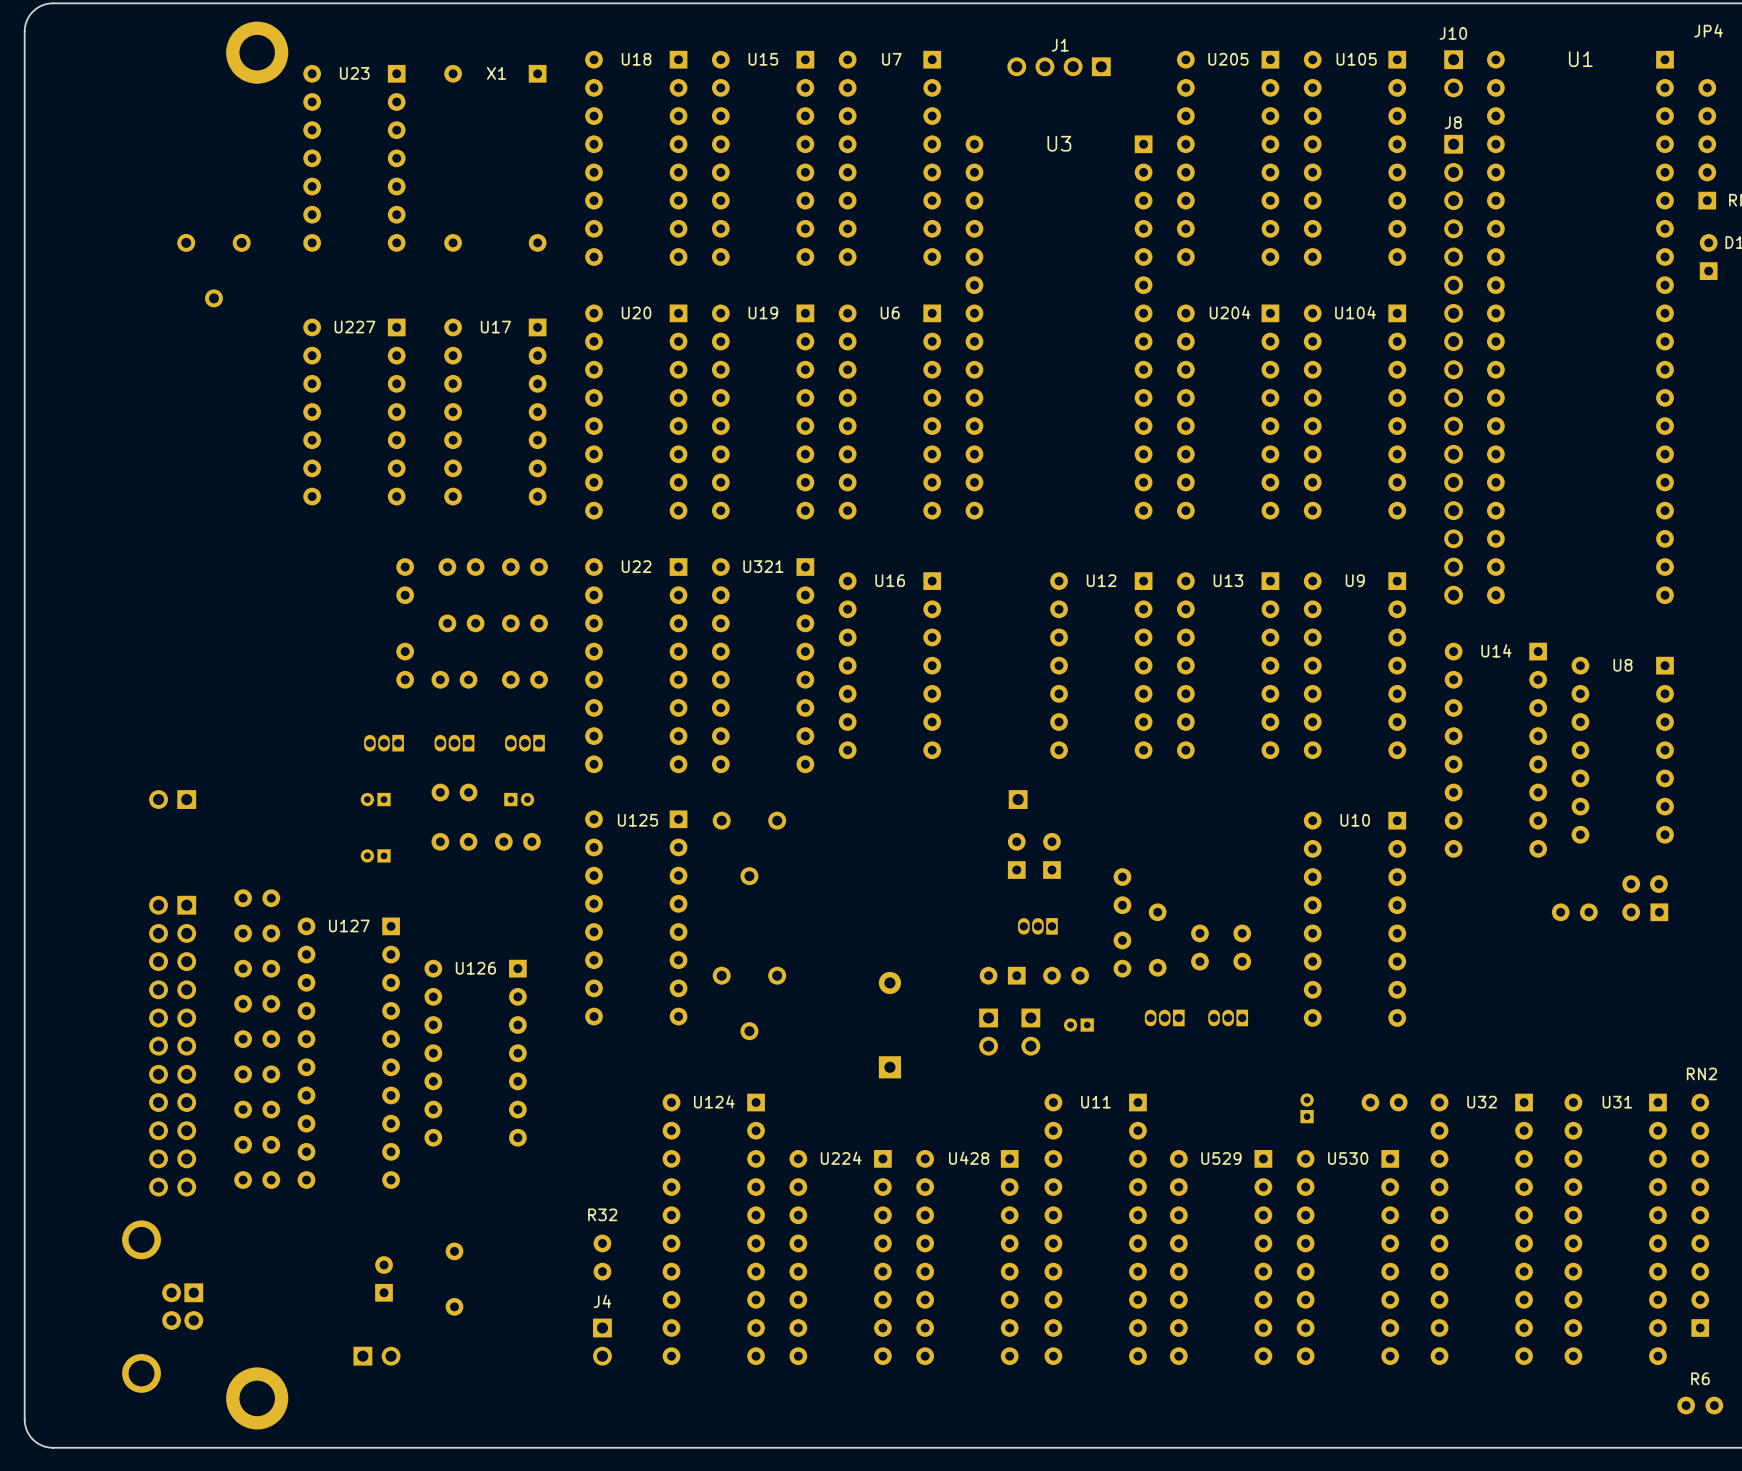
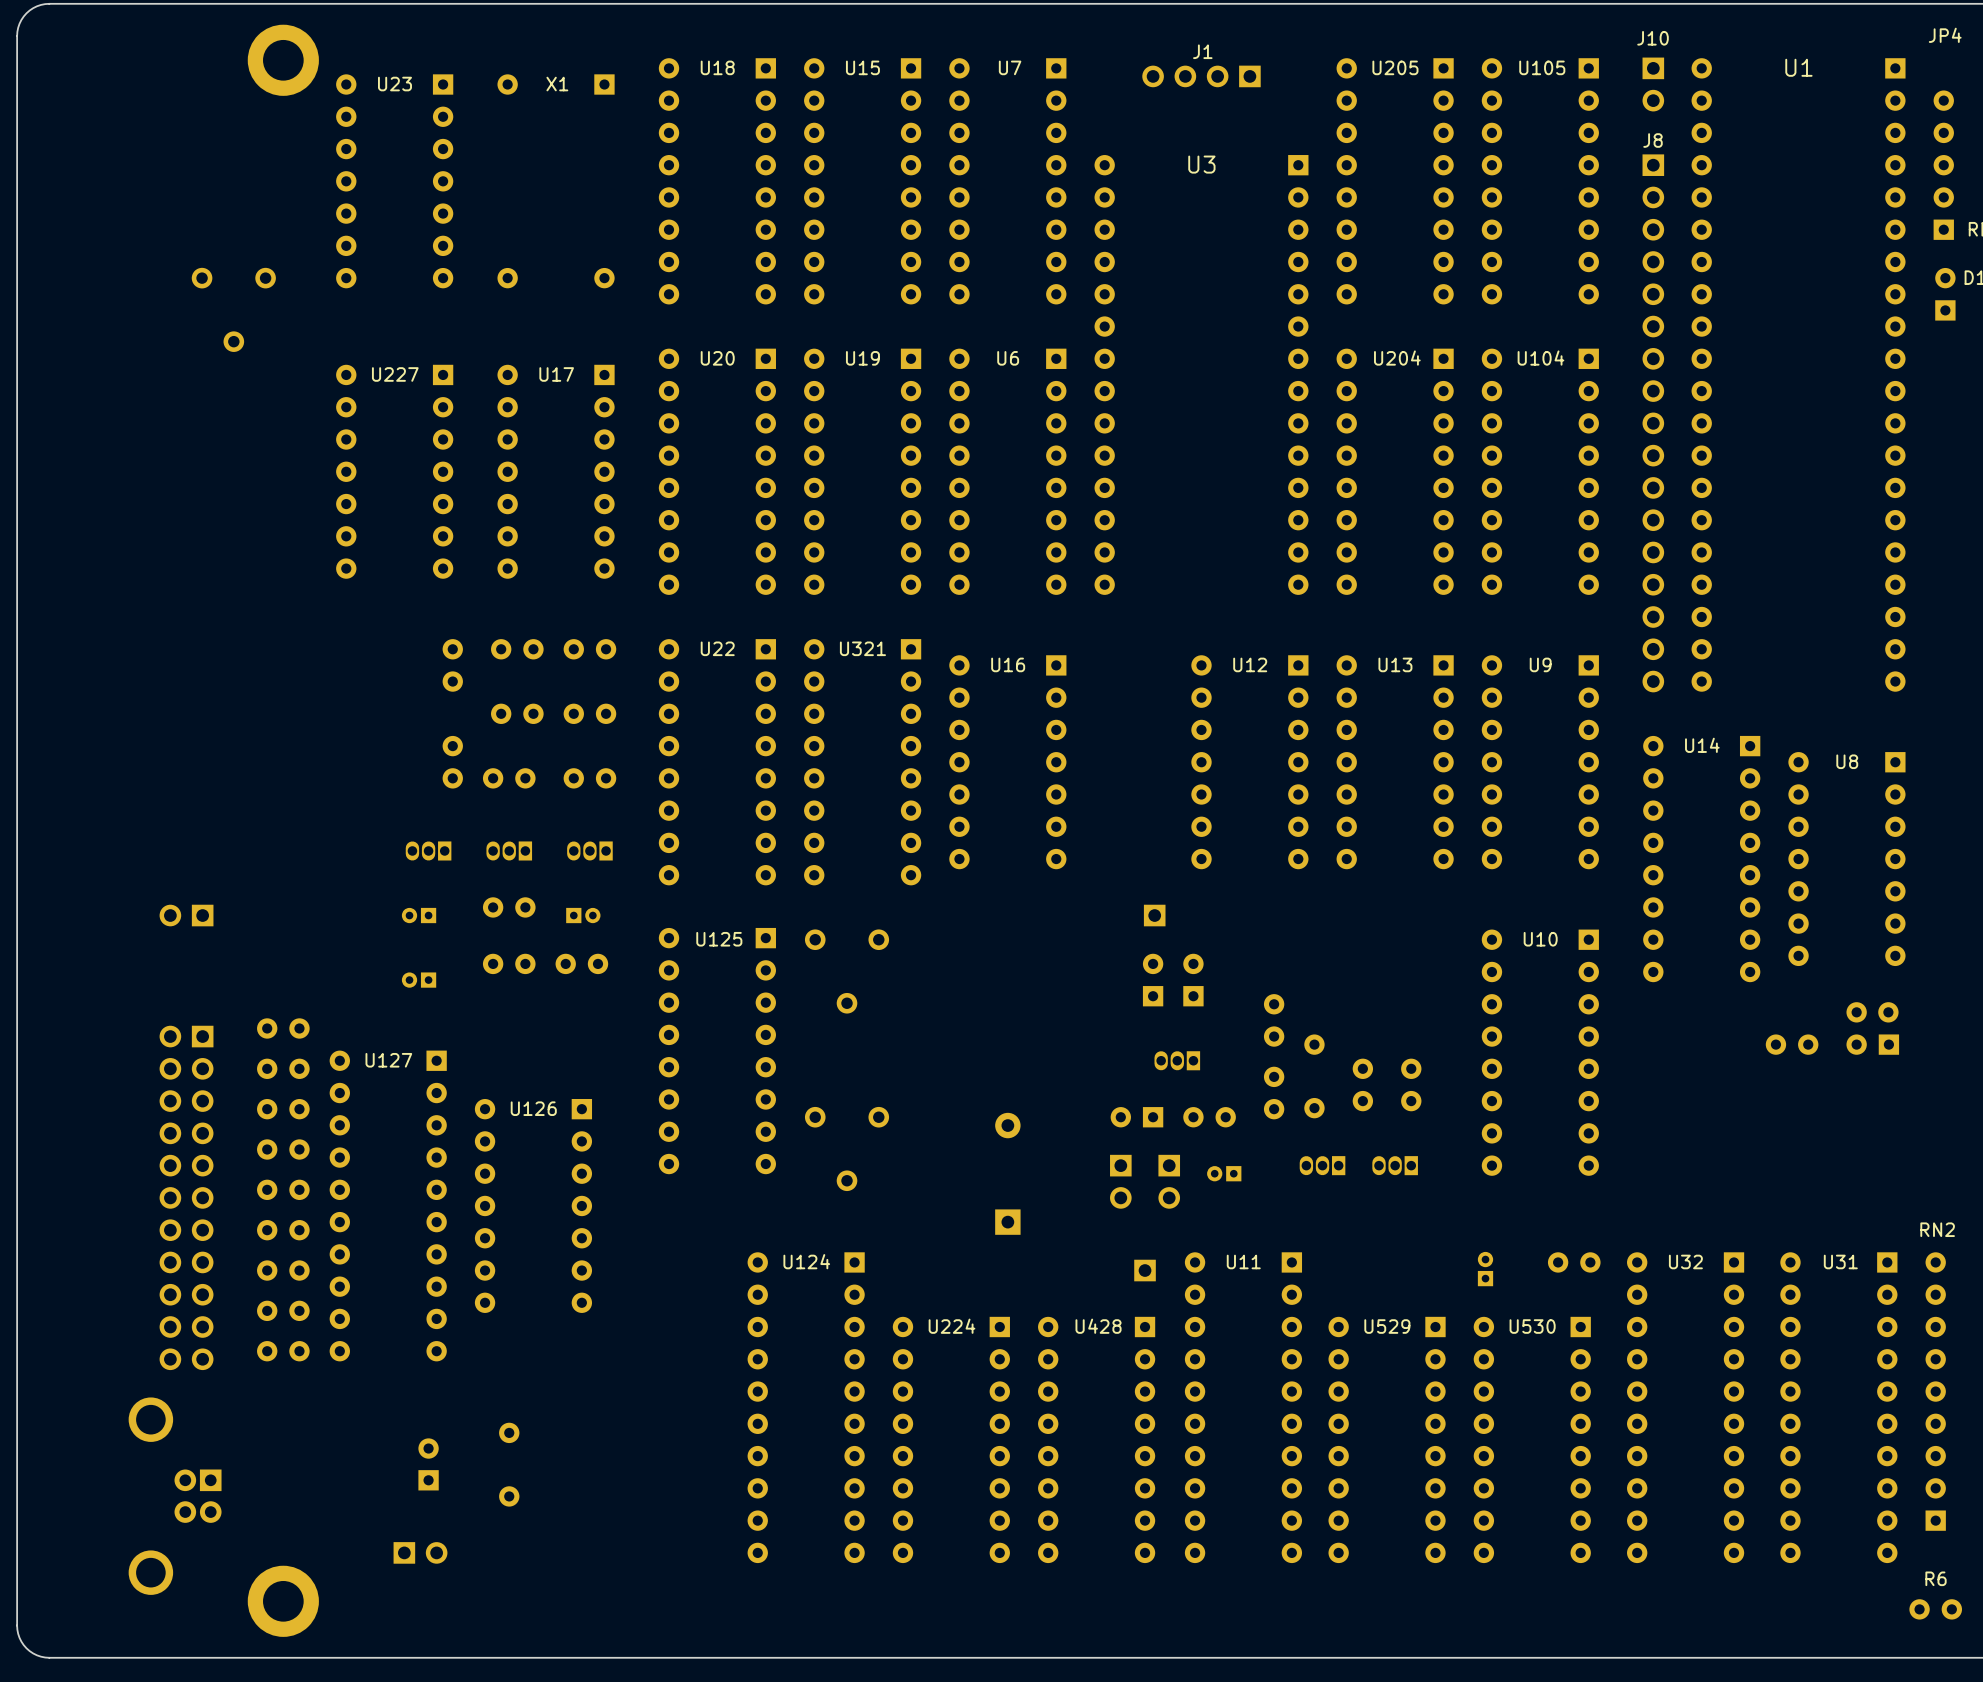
part: none -> (1145, 1270)
R32: (602, 1257) -> none
J4: (602, 1342) -> none

